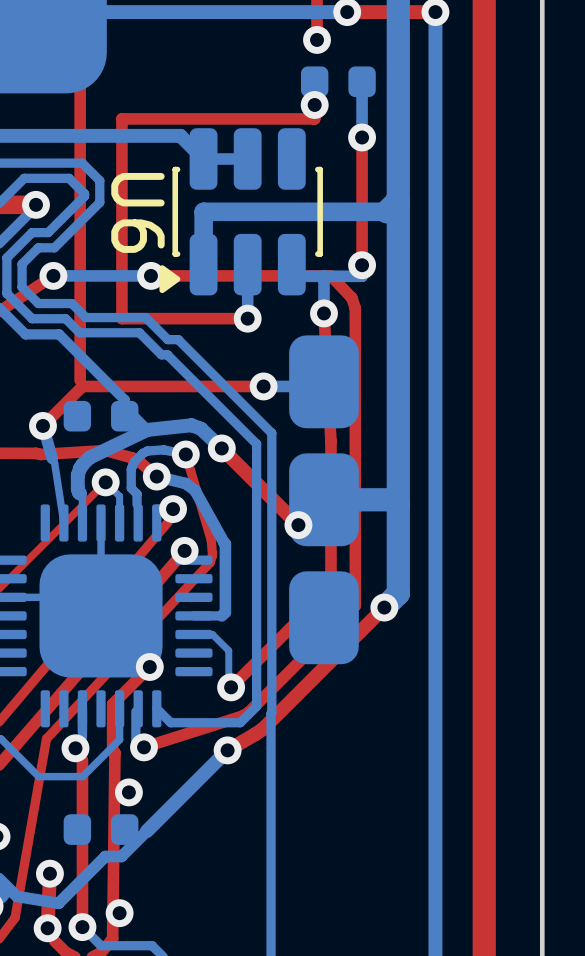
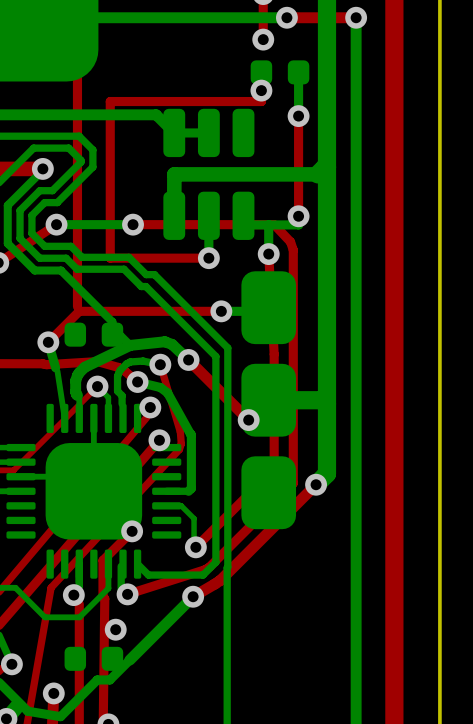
U6: (241, 211) -> none

